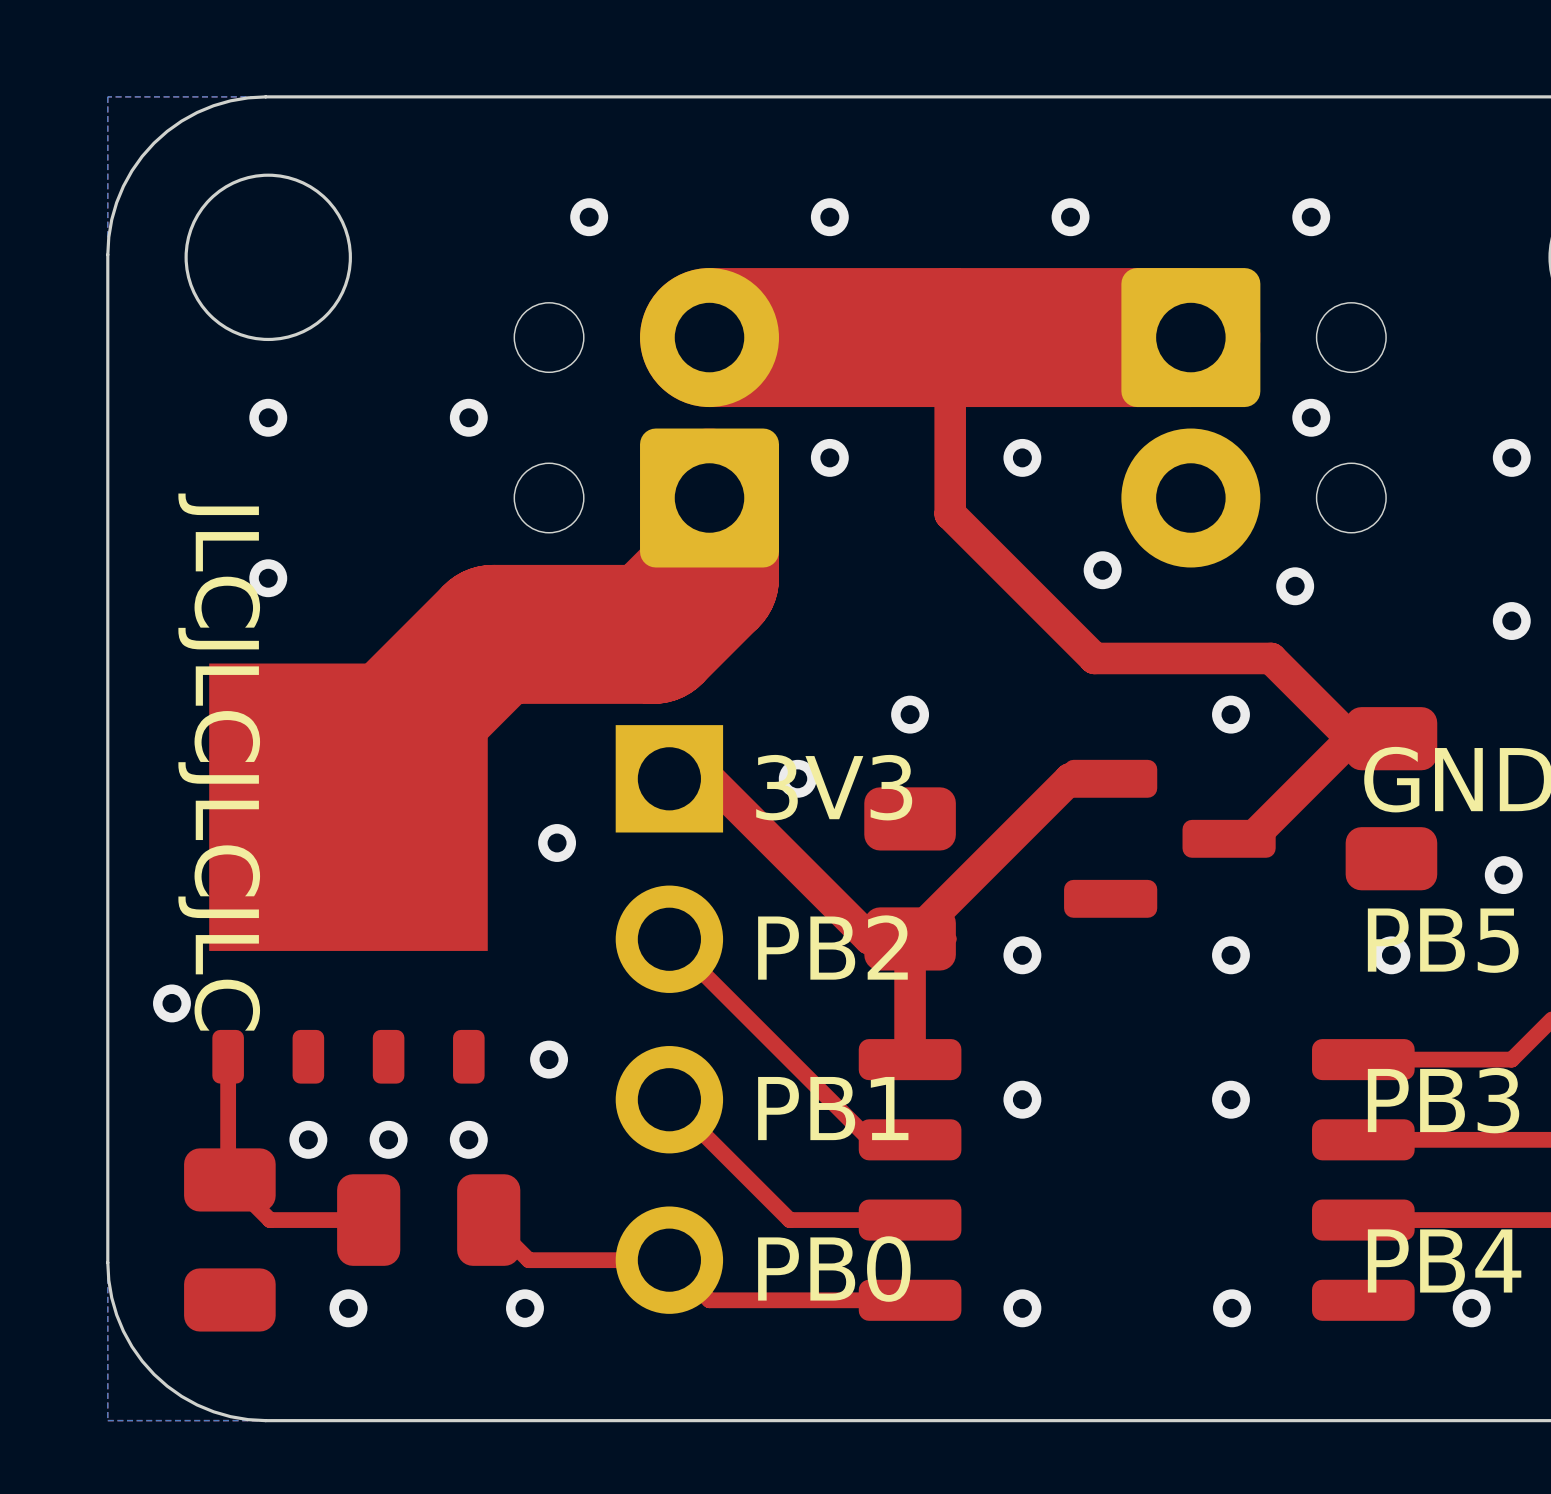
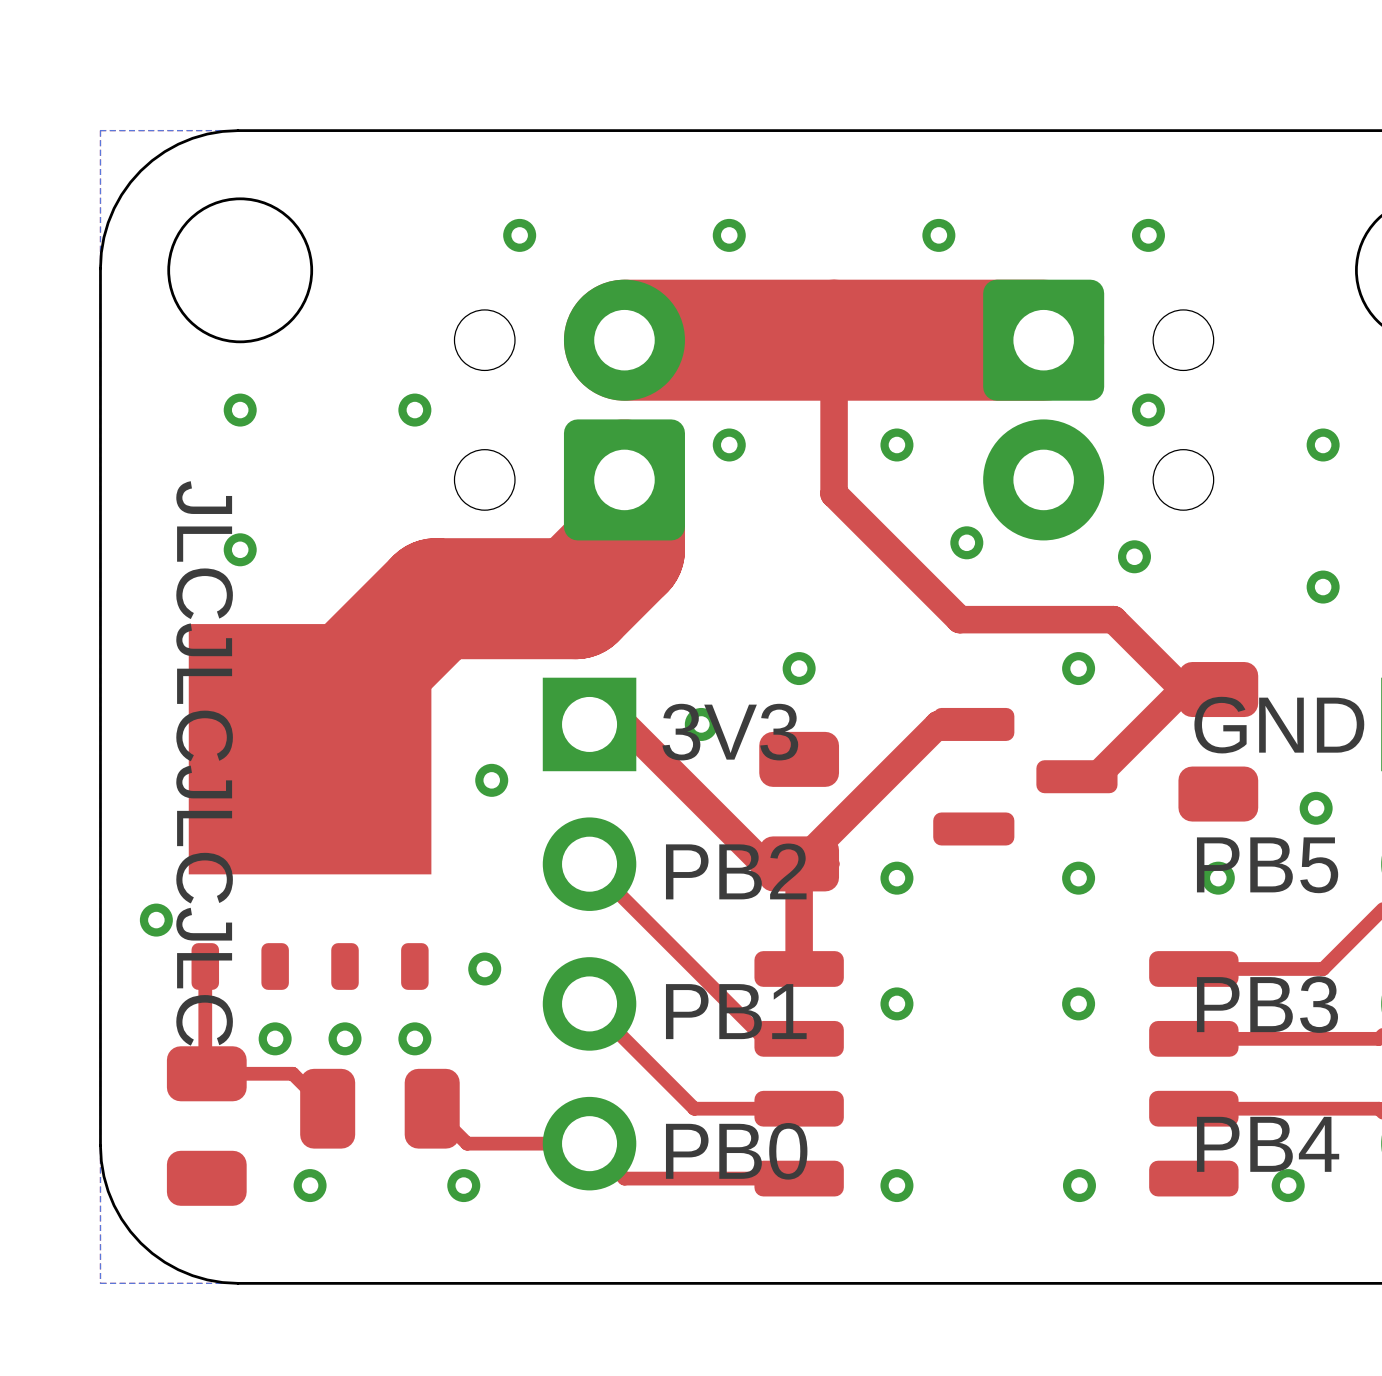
top track: (229, 1179) (269, 1220) (368, 1220) -> (206, 1073) (292, 1073) (327, 1108)

